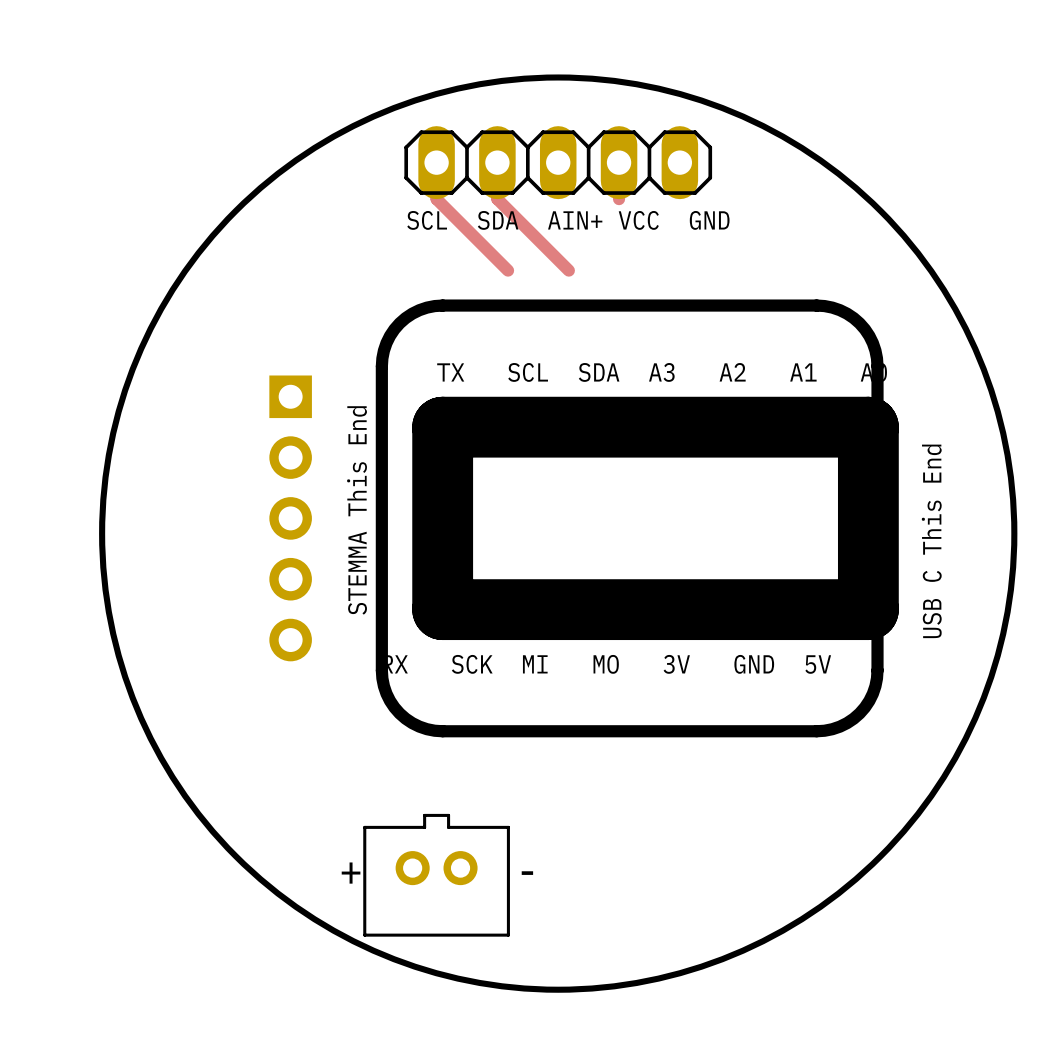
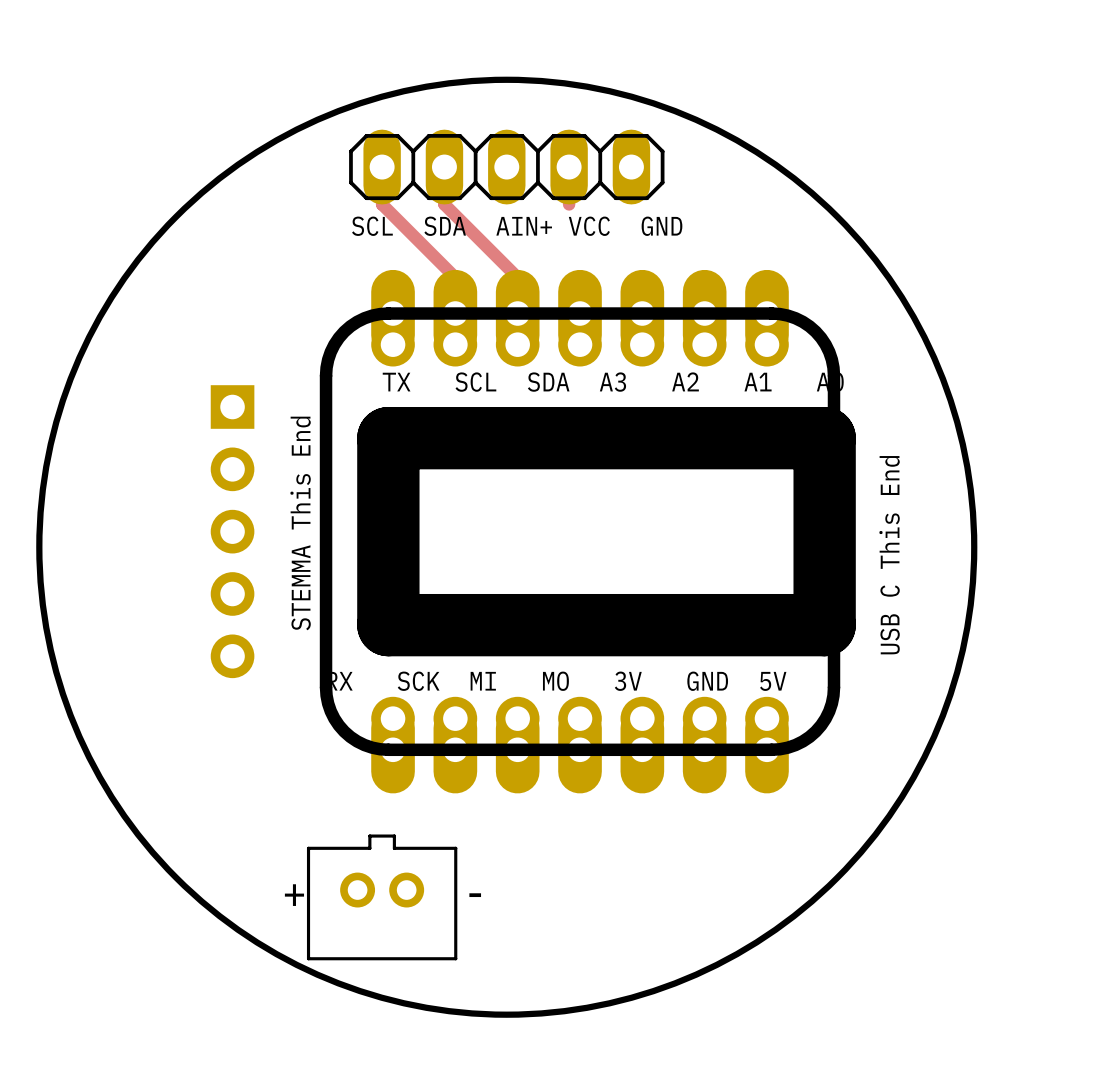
part: none -> (580, 318)
part: none -> (580, 745)

